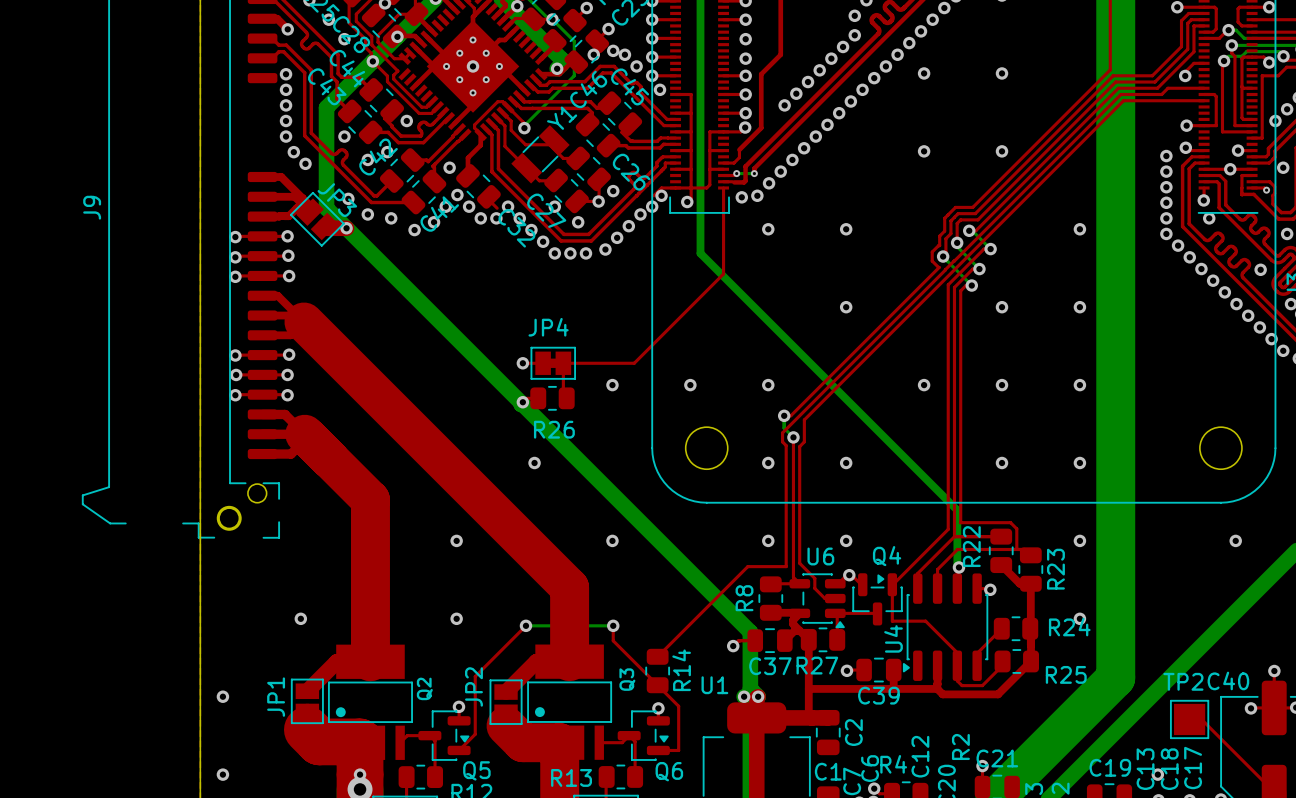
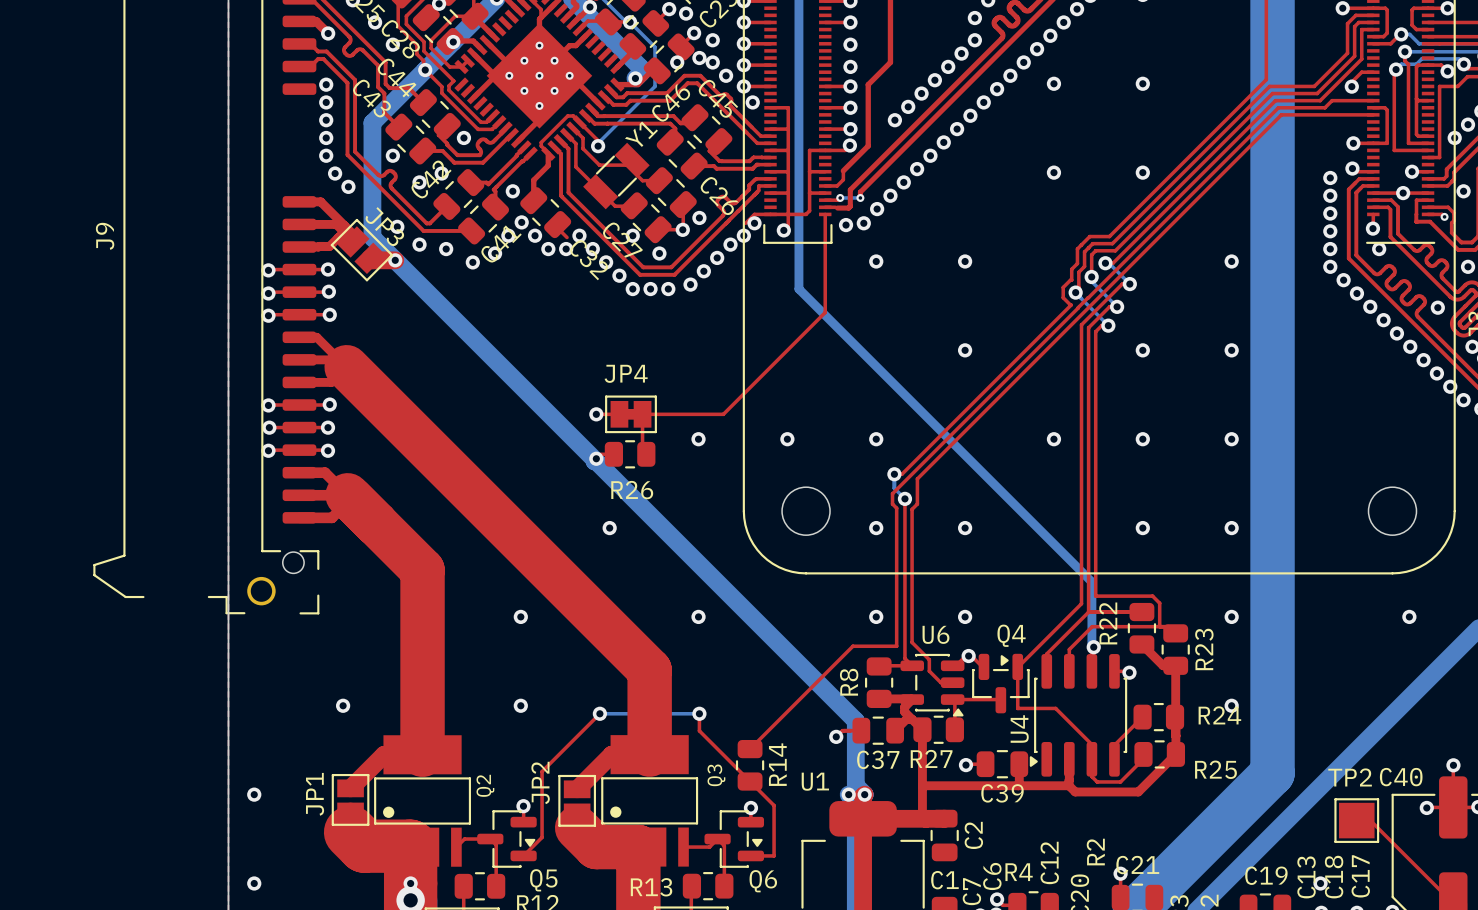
via: none -> (686, 13)
via: none -> (712, 40)
via: (473, 66) -> none

